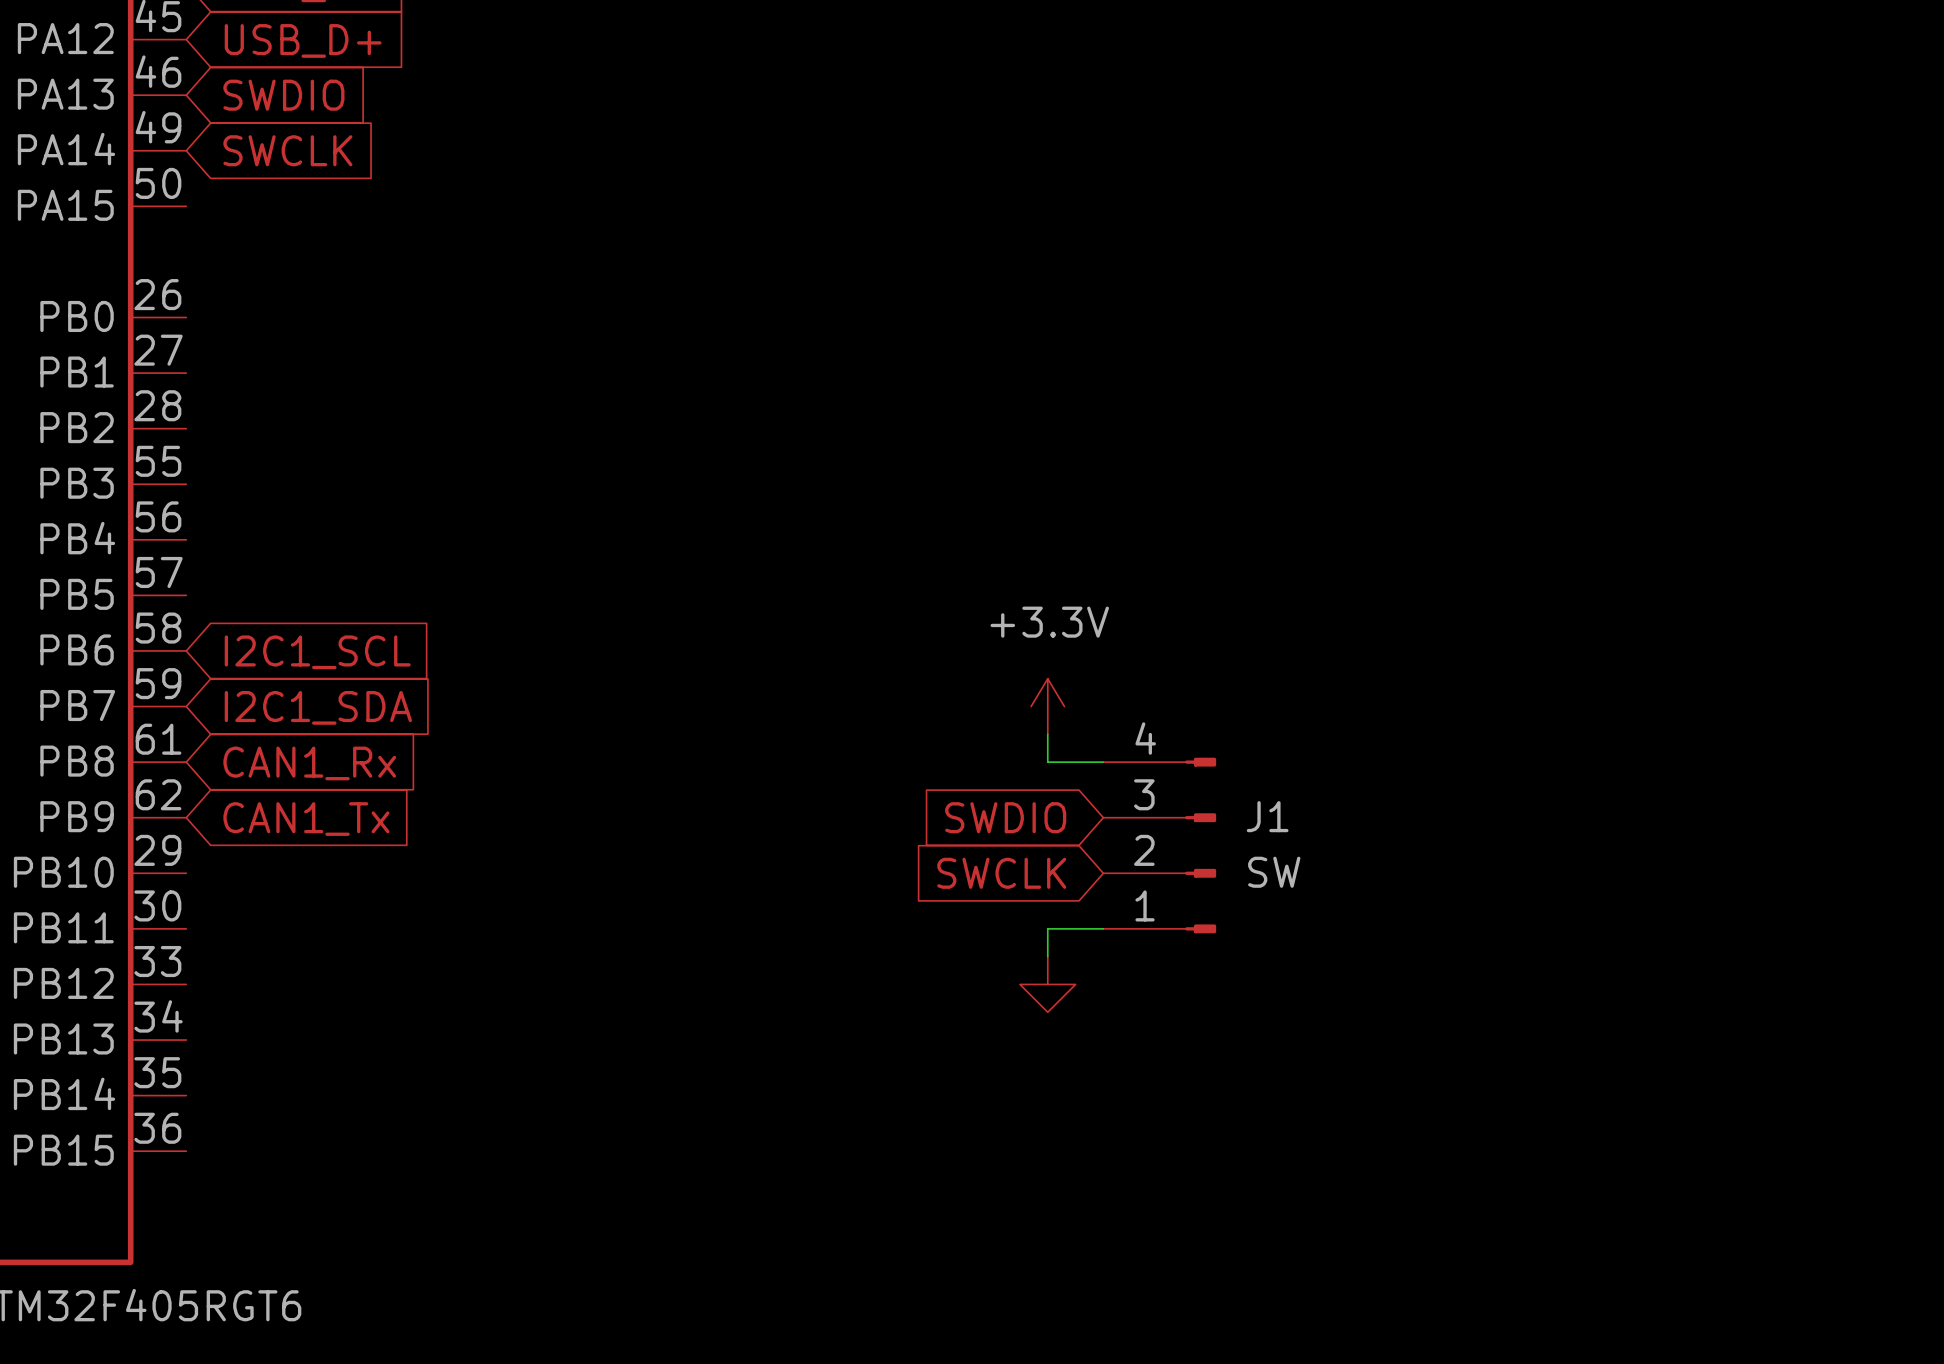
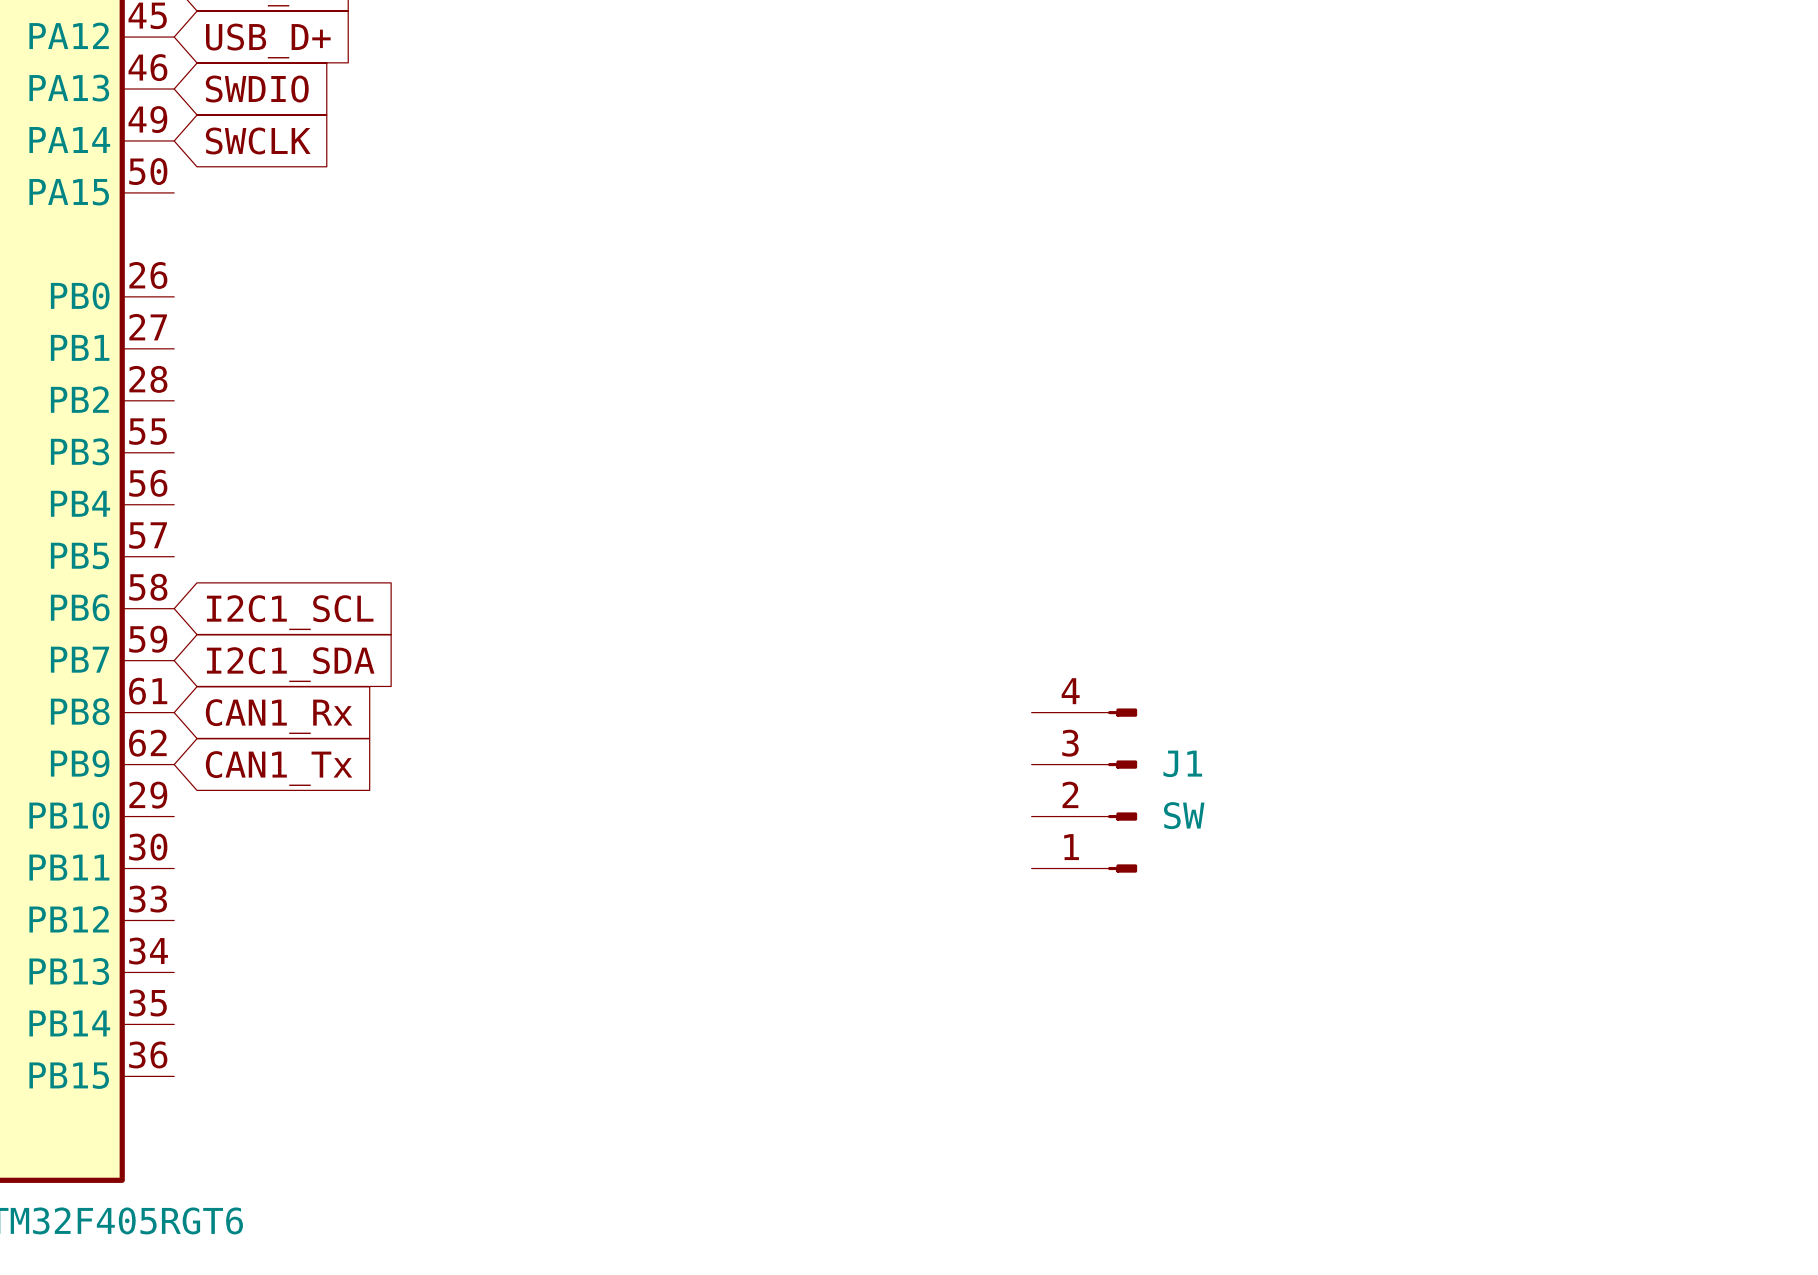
power symbol: +3.3V (1047, 706) -> none
wire: (1047, 734) (1047, 762) (1103, 762) -> none
global label: SWDIO (1005, 817) -> none
global label: SWCLK (1001, 873) -> none
wire: (1103, 928) (1047, 928) (1047, 956) -> none
power symbol: (1047, 984) -> none

